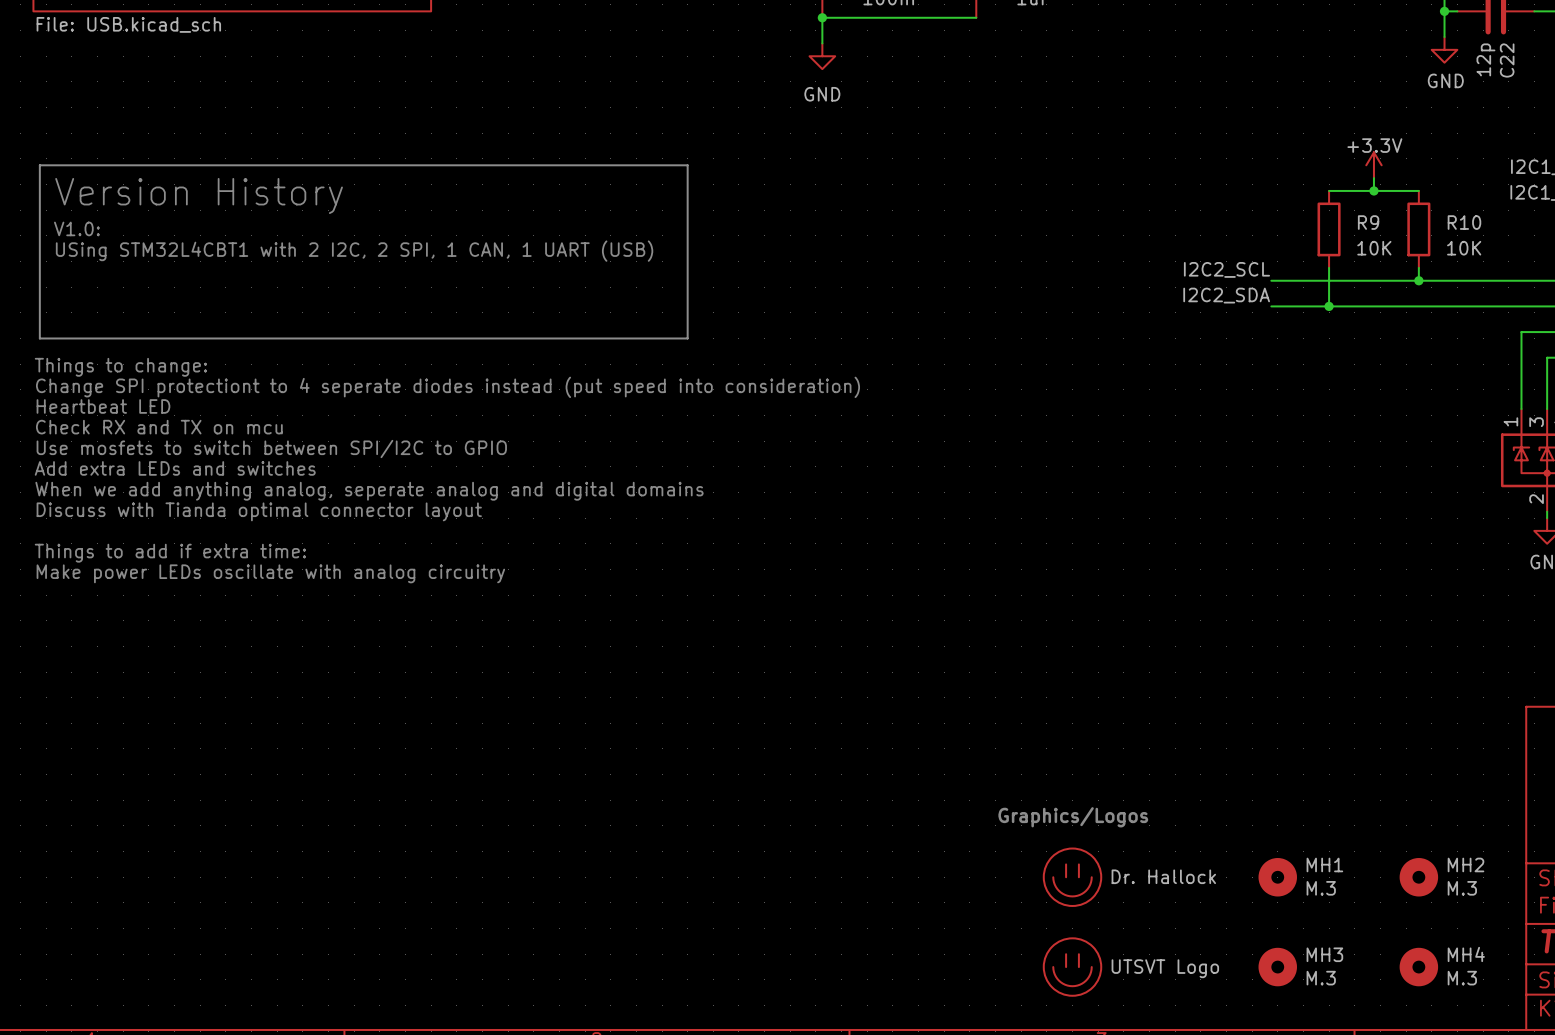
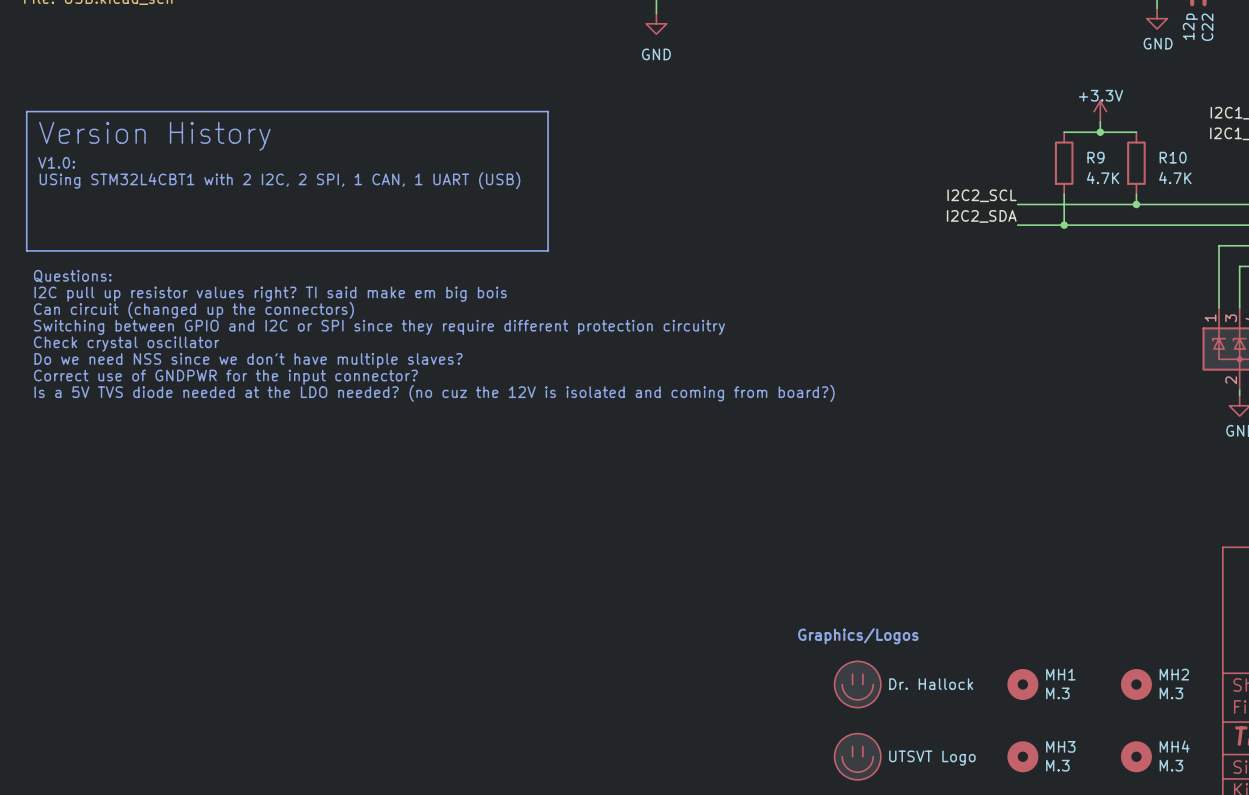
R9 value: 10K (1374, 248) -> 4.7K (1103, 178)
R10 value: 10K (1464, 248) -> 4.7K (1175, 178)
text: Things to change: (120, 367) -> none
text: none -> Questions: (72, 276)
text: Change SPI protectiont to 4 seperate diodes instead (put speed into consideration) (448, 387) -> none
text: none -> I2C pull up resistor values right? TI said make em big bois (270, 294)
text: Heartbeat LED (103, 406) -> none
text: none -> Can circuit (changed up the connectors) (193, 310)
text: Check RX and TX on mcu (159, 427) -> none
text: none -> Switching between GPIO and I2C or SPI since they require different protection circuitry (379, 327)
text: Use mosfets to switch between SPI/I2C to GPIO (271, 449) -> none
text: none -> Check crystal oscillator (126, 344)
text: Add extra LEDs and switches (175, 468) -> none
text: none -> Do we need NSS since we don't have multiple slaves? (248, 360)
text: When we add anything analog, seperate analog and digital domains (369, 491) -> none
text: none -> Correct use of GNDPWR for the input connector? (225, 377)
text: Discuss with Tianda optimal connector layout (259, 511) -> none
text: none -> Is a 5V TVS diode needed at the LDO needed? (no cuz the 12V is isolated and coming from board?) (434, 393)
text: Things to add if extra time: (170, 553) -> none
text: Make power LEDs oscillate with analog circuitry (270, 573) -> none

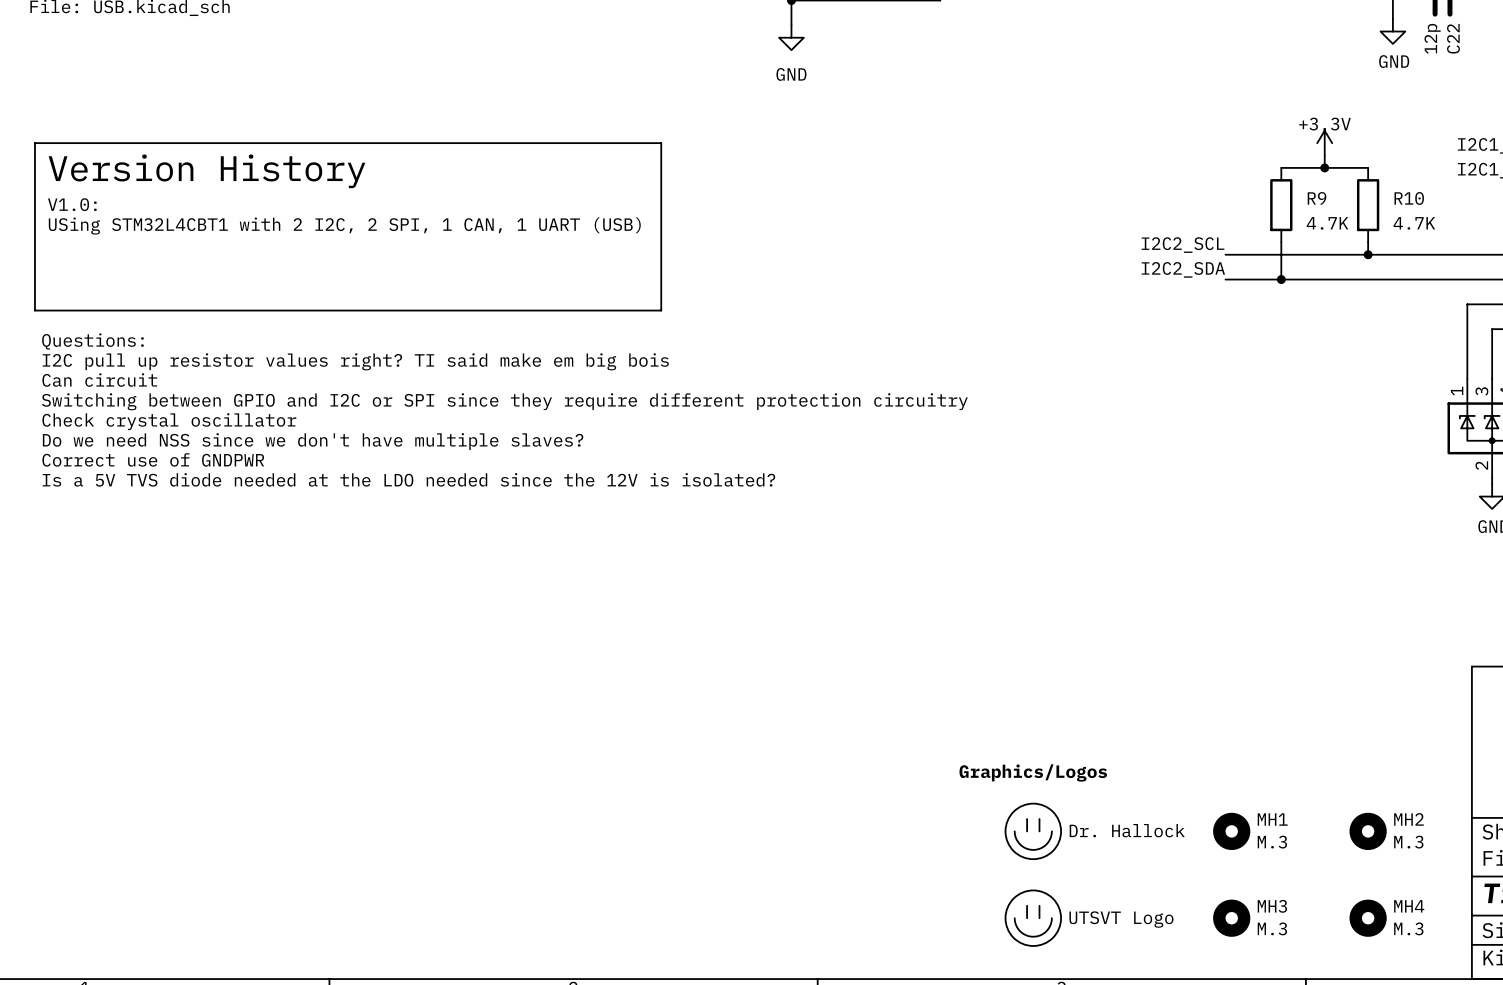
text: Can circuit (changed up the connectors) (193, 310) -> Can circuit (99, 380)
text: Correct use of GNDPWR for the input connector? (225, 377) -> Correct use of GNDPWR (153, 459)
text: Is a 5V TVS diode needed at the LDO needed? (no cuz the 12V is isolated and coming from board?) (434, 393) -> Is a 5V TVS diode needed at the LDO needed since the 12V is isolated? (408, 479)

